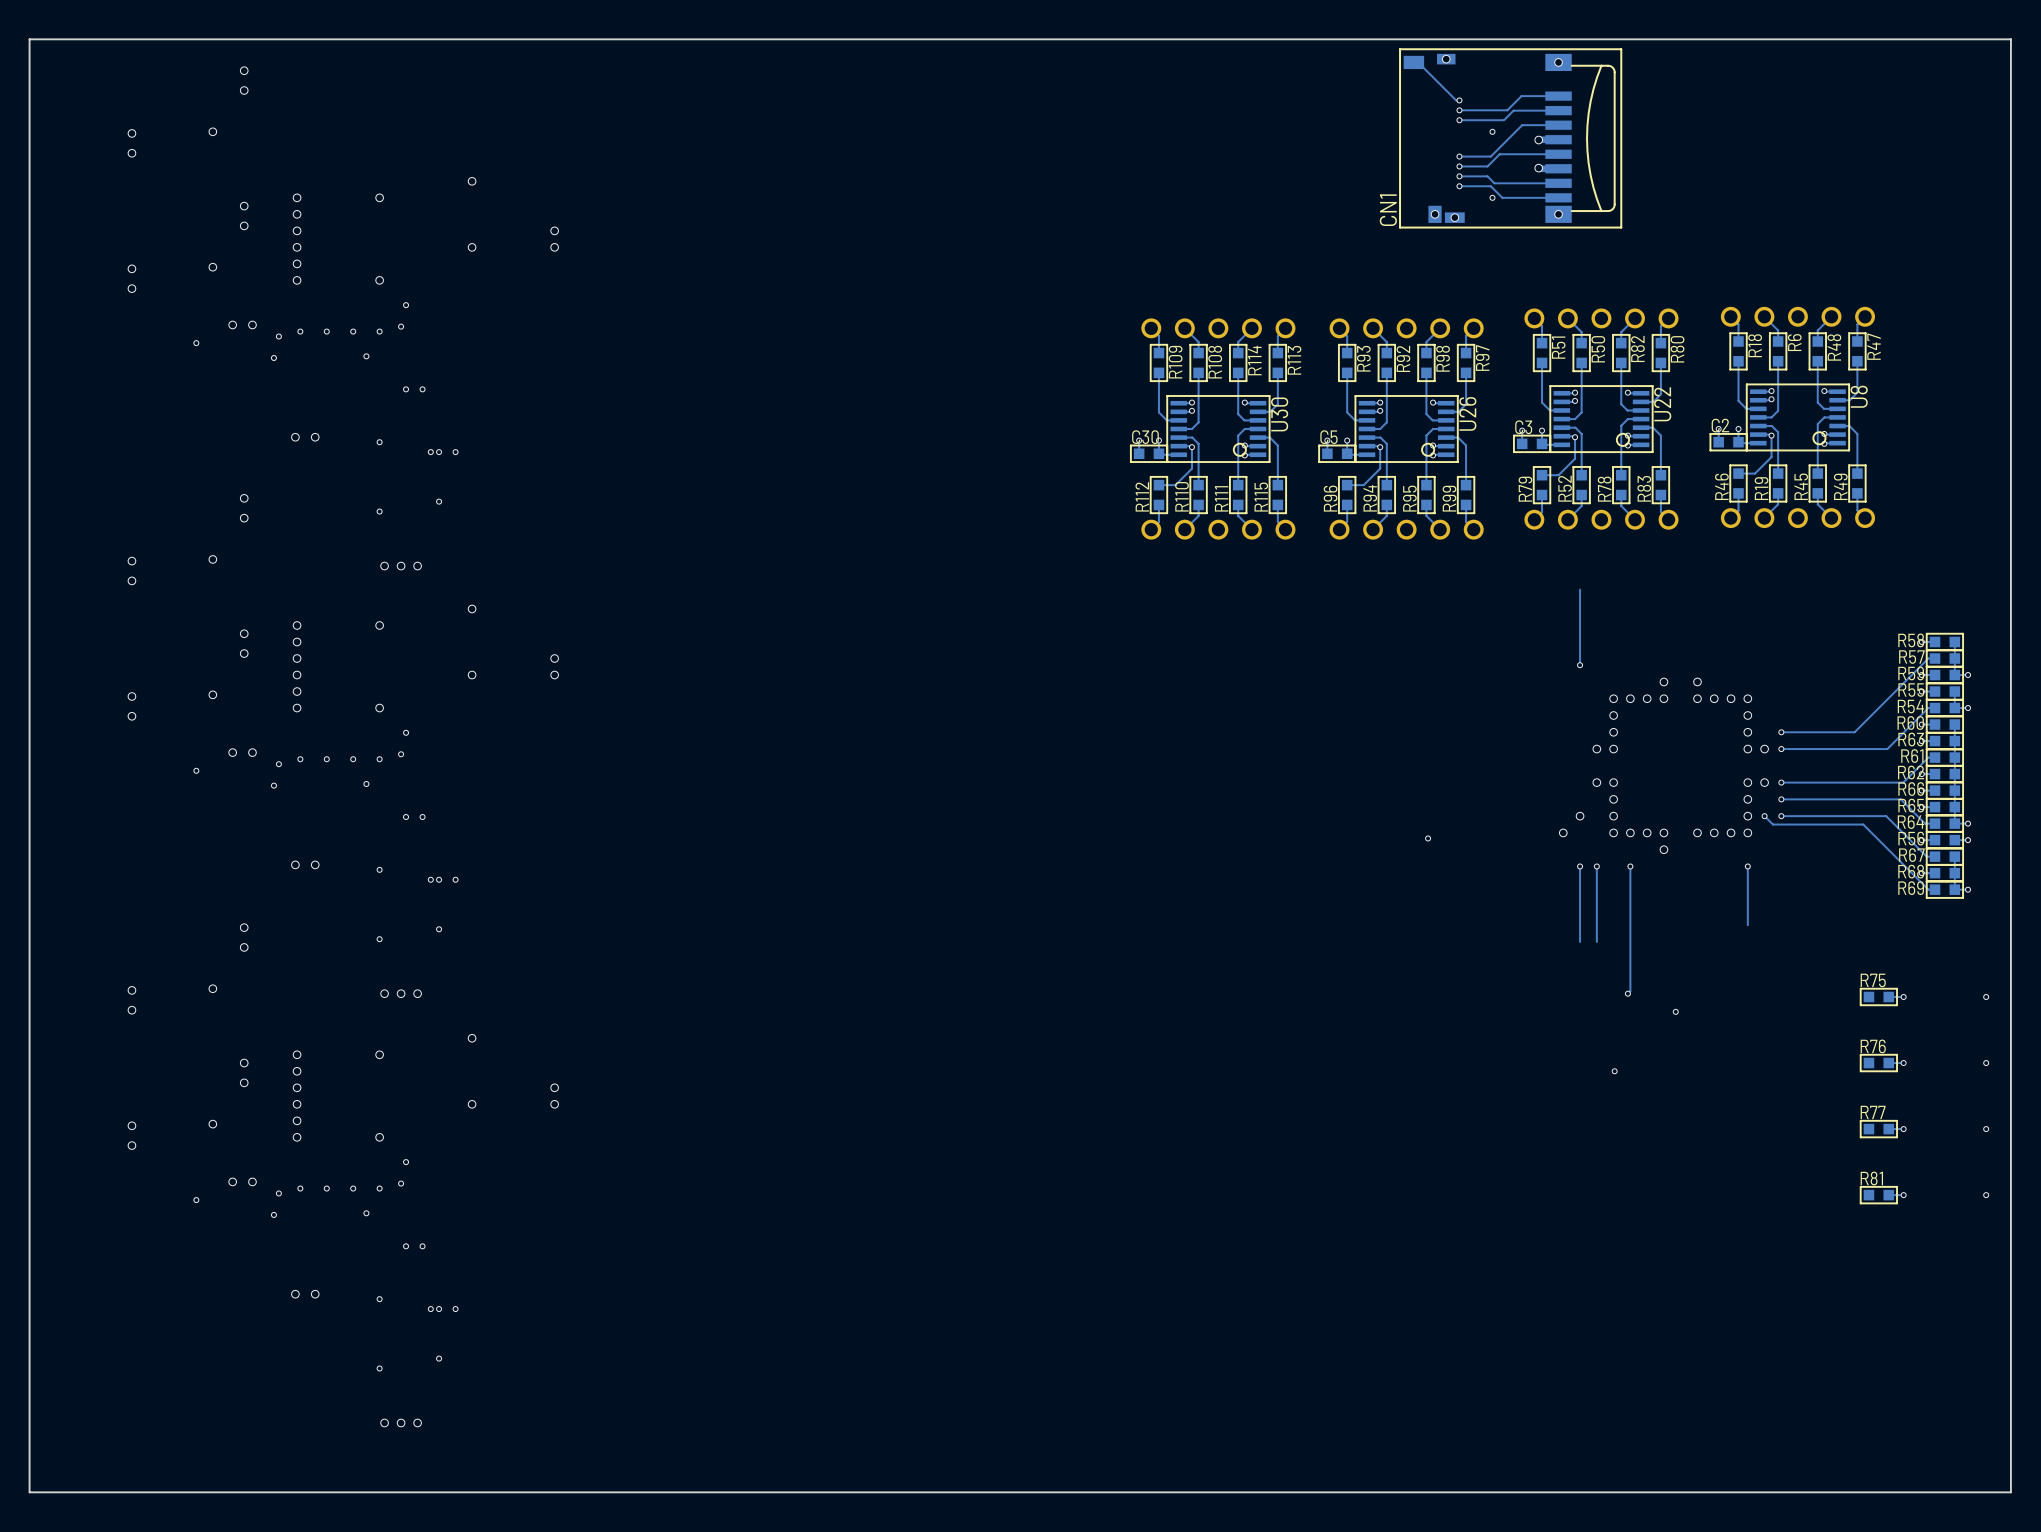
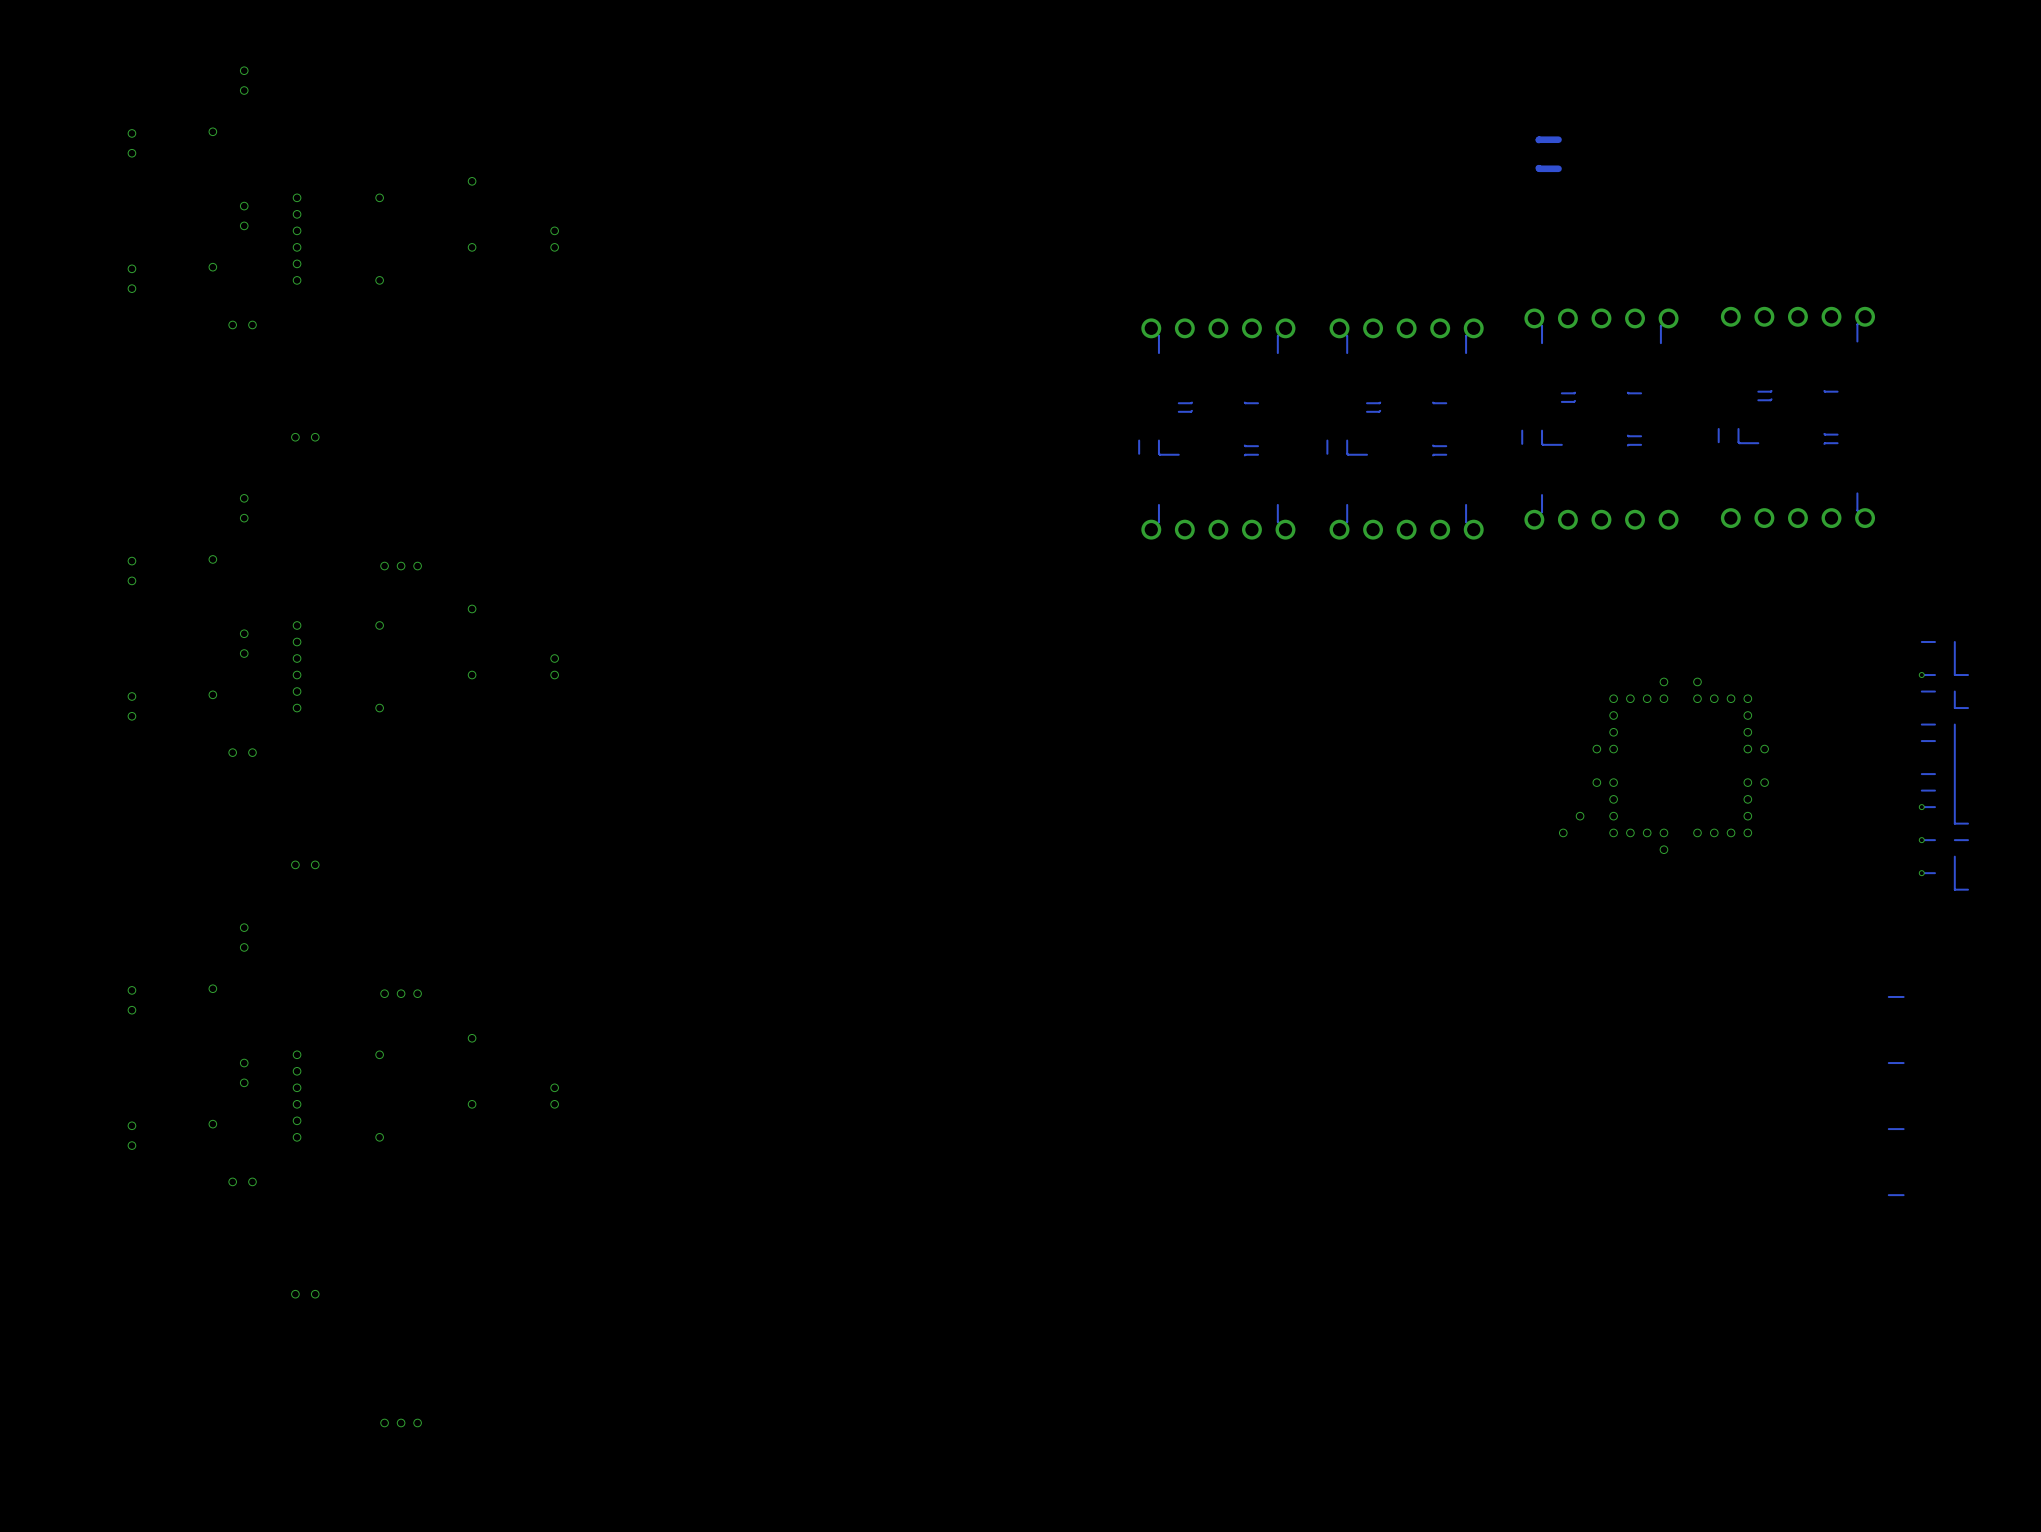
board edge: (2010, 39) (29, 39) (29, 1492) (2010, 1492) (2010, 39) -> none
via: (1446, 59) -> none
track: (1413, 62) (1418, 62) (1456, 100) (1459, 100) -> none
via: (1558, 62) -> none
track: (1558, 96) (1521, 96) (1507, 110) (1459, 110) -> none
via: (1459, 100) -> none
via: (1459, 110) -> none
track: (1558, 110) (1513, 110) (1504, 120) (1459, 120) -> none
via: (1459, 120) -> none
track: (1558, 125) (1522, 125) (1490, 156) (1459, 156) -> none
via: (1492, 131) -> none
CN1: (1510, 138) -> none
via: (1538, 140) -> none
track: (1558, 154) (1499, 154) (1487, 166) (1459, 166) -> none
via: (1459, 156) -> none
via: (1459, 166) -> none
via: (1538, 168) -> none
track: (1459, 176) (1487, 176) (1494, 183) (1558, 183) -> none
via: (1459, 176) -> none
track: (1459, 186) (1490, 186) (1502, 197) (1558, 197) -> none
via: (1459, 186) -> none
via: (1492, 197) -> none
via: (1435, 214) -> none
via: (1558, 214) -> none
via: (1454, 217) -> none
via: (406, 305) -> none
track: (1730, 316) (1738, 324) (1738, 341) -> none
track: (1764, 316) (1778, 330) (1778, 341) -> none
track: (1831, 316) (1817, 330) (1817, 341) -> none
track: (1567, 318) (1581, 332) (1581, 343) -> none
track: (1635, 318) (1621, 332) (1621, 343) -> none
via: (401, 326) -> none
track: (1184, 328) (1198, 342) (1198, 353) -> none
track: (1251, 328) (1238, 342) (1238, 353) -> none
track: (1373, 328) (1386, 342) (1386, 353) -> none
track: (1440, 328) (1426, 342) (1426, 353) -> none
via: (300, 331) -> none
via: (326, 331) -> none
via: (353, 331) -> none
via: (379, 331) -> none
via: (278, 336) -> none
via: (196, 343) -> none
R18: (1738, 351) -> none
R6: (1778, 351) -> none
R48: (1817, 351) -> none
R47: (1857, 351) -> none
R51: (1542, 353) -> none
R50: (1581, 353) -> none
R82: (1621, 353) -> none
R80: (1660, 353) -> none
via: (366, 356) -> none
via: (273, 357) -> none
track: (1738, 361) (1738, 400) (1746, 408) (1758, 408) -> none
track: (1778, 361) (1778, 410) (1771, 417) (1758, 417) -> none
track: (1817, 361) (1817, 402) (1824, 408) (1837, 408) -> none
track: (1857, 361) (1857, 392) (1849, 400) (1837, 400) -> none
R109: (1158, 362) -> none
R108: (1198, 362) -> none
R114: (1238, 362) -> none
R113: (1277, 362) -> none
R93: (1347, 362) -> none
R92: (1386, 362) -> none
R98: (1426, 362) -> none
R97: (1466, 362) -> none
track: (1542, 362) (1542, 402) (1549, 410) (1561, 410) -> none
track: (1581, 362) (1581, 412) (1575, 419) (1561, 419) -> none
track: (1621, 362) (1621, 404) (1627, 410) (1641, 410) -> none
track: (1660, 362) (1660, 394) (1653, 401) (1641, 401) -> none
track: (1158, 372) (1158, 412) (1166, 420) (1178, 420) -> none
track: (1198, 372) (1198, 422) (1191, 428) (1178, 428) -> none
track: (1238, 372) (1238, 414) (1244, 420) (1258, 420) -> none
track: (1277, 372) (1277, 404) (1270, 411) (1258, 411) -> none
track: (1347, 372) (1347, 412) (1355, 420) (1367, 420) -> none
track: (1386, 372) (1386, 422) (1380, 428) (1367, 428) -> none
track: (1426, 372) (1426, 414) (1432, 420) (1446, 420) -> none
track: (1466, 372) (1466, 404) (1458, 411) (1446, 411) -> none
via: (406, 389) -> none
via: (422, 389) -> none
via: (1771, 391) -> none
via: (1824, 391) -> none
via: (1575, 392) -> none
via: (1627, 392) -> none
via: (1771, 399) -> none
via: (1575, 400) -> none
via: (1191, 402) -> none
via: (1244, 402) -> none
via: (1380, 402) -> none
via: (1433, 402) -> none
via: (1191, 410) -> none
via: (1380, 410) -> none
U8: (1797, 417) -> none
track: (1837, 417) (1824, 417) (1817, 424) (1817, 473) -> none
U22: (1601, 419) -> none
track: (1641, 419) (1627, 419) (1621, 425) (1621, 475) -> none
track: (1758, 426) (1771, 426) (1778, 432) (1778, 473) -> none
track: (1837, 426) (1849, 426) (1857, 433) (1857, 473) -> none
track: (1561, 427) (1575, 427) (1581, 433) (1581, 475) -> none
track: (1641, 427) (1652, 427) (1660, 435) (1660, 475) -> none
U30: (1218, 428) -> none
track: (1258, 428) (1244, 428) (1238, 435) (1238, 485) -> none
U26: (1406, 428) -> none
track: (1446, 428) (1433, 428) (1426, 435) (1426, 485) -> none
via: (1718, 428) -> none
via: (1738, 428) -> none
via: (1522, 430) -> none
via: (1542, 430) -> none
via: (1824, 433) -> none
track: (1758, 434) (1771, 435) (1771, 457) (1755, 473) (1738, 473) -> none
via: (1627, 435) -> none
via: (1771, 435) -> none
track: (1561, 436) (1575, 437) (1575, 458) (1558, 475) (1542, 475) -> none
track: (1178, 437) (1192, 437) (1198, 443) (1198, 485) -> none
track: (1258, 437) (1269, 437) (1277, 445) (1277, 485) -> none
track: (1367, 437) (1380, 437) (1386, 443) (1386, 485) -> none
track: (1446, 437) (1458, 437) (1466, 445) (1466, 485) -> none
via: (1575, 437) -> none
via: (1139, 440) -> none
via: (1158, 440) -> none
via: (1327, 440) -> none
via: (1347, 440) -> none
via: (379, 442) -> none
C2: (1728, 442) -> none
C3: (1532, 443) -> none
via: (1824, 443) -> none
via: (1244, 445) -> none
via: (1433, 445) -> none
via: (1627, 445) -> none
track: (1178, 446) (1191, 447) (1191, 468) (1175, 485) (1158, 485) -> none
track: (1367, 446) (1380, 447) (1380, 468) (1363, 485) (1347, 485) -> none
via: (1191, 447) -> none
via: (1380, 447) -> none
via: (430, 452) -> none
via: (439, 452) -> none
via: (455, 452) -> none
C30: (1149, 453) -> none
C5: (1337, 453) -> none
via: (1244, 455) -> none
via: (1433, 455) -> none
R46: (1738, 483) -> none
R19: (1778, 483) -> none
R45: (1817, 483) -> none
R49: (1857, 483) -> none
R79: (1542, 485) -> none
R52: (1581, 485) -> none
R78: (1621, 485) -> none
R83: (1660, 485) -> none
track: (1738, 493) (1738, 510) (1730, 518) -> none
track: (1778, 493) (1778, 504) (1764, 518) -> none
track: (1817, 493) (1817, 504) (1831, 518) -> none
R112: (1158, 495) -> none
R110: (1198, 495) -> none
R111: (1238, 495) -> none
R115: (1277, 495) -> none
R96: (1347, 495) -> none
R94: (1386, 495) -> none
R95: (1426, 495) -> none
R99: (1466, 495) -> none
track: (1581, 495) (1581, 506) (1567, 519) -> none
track: (1621, 495) (1621, 506) (1635, 519) -> none
track: (1660, 495) (1660, 512) (1668, 519) -> none
via: (439, 501) -> none
track: (1198, 504) (1198, 515) (1184, 529) -> none
track: (1238, 504) (1238, 515) (1251, 529) -> none
track: (1386, 504) (1386, 515) (1373, 529) -> none
track: (1426, 504) (1426, 515) (1440, 529) -> none
via: (379, 511) -> none
track: (1580, 589) (1580, 665) -> none
via: (1921, 641) -> none
R58: (1944, 641) -> none
track: (1934, 658) (1928, 658) (1854, 732) (1781, 732) -> none
R57: (1944, 658) -> none
via: (1580, 665) -> none
R59: (1944, 675) -> none
via: (1968, 675) -> none
via: (1921, 691) -> none
R55: (1944, 691) -> none
track: (1934, 708) (1928, 708) (1887, 749) (1781, 749) -> none
R54: (1944, 708) -> none
via: (1968, 708) -> none
via: (1921, 724) -> none
R60: (1944, 724) -> none
via: (406, 732) -> none
via: (1781, 732) -> none
via: (1921, 741) -> none
R63: (1944, 741) -> none
via: (1781, 749) -> none
via: (401, 754) -> none
track: (1934, 757) (1928, 757) (1903, 782) (1781, 782) -> none
R61: (1944, 757) -> none
via: (300, 759) -> none
via: (326, 759) -> none
via: (353, 759) -> none
via: (379, 759) -> none
via: (278, 764) -> none
via: (196, 770) -> none
via: (1921, 774) -> none
R62: (1944, 774) -> none
via: (1781, 782) -> none
via: (366, 783) -> none
via: (273, 785) -> none
via: (1921, 790) -> none
R66: (1944, 790) -> none
track: (1781, 799) (1900, 799) (1925, 823) (1934, 823) -> none
via: (1781, 799) -> none
R65: (1944, 807) -> none
track: (1764, 816) (1772, 824) (1863, 824) (1928, 889) (1934, 889) -> none
via: (1764, 816) -> none
track: (1781, 816) (1886, 816) (1926, 856) (1934, 856) -> none
via: (1781, 816) -> none
via: (406, 817) -> none
via: (422, 817) -> none
R64: (1944, 823) -> none
via: (1968, 823) -> none
via: (1428, 838) -> none
R56: (1944, 840) -> none
via: (1968, 840) -> none
R67: (1944, 856) -> none
track: (1580, 866) (1580, 941) -> none
via: (1580, 866) -> none
track: (1596, 866) (1596, 941) -> none
via: (1596, 866) -> none
track: (1630, 866) (1630, 991) (1627, 993) -> none
via: (1630, 866) -> none
track: (1747, 866) (1747, 925) -> none
via: (1747, 866) -> none
via: (379, 869) -> none
R68: (1944, 873) -> none
via: (430, 879) -> none
via: (439, 879) -> none
via: (455, 879) -> none
R69: (1944, 889) -> none
via: (1968, 889) -> none
via: (439, 929) -> none
via: (379, 939) -> none
via: (1627, 993) -> none
R75: (1878, 996) -> none
via: (1903, 996) -> none
via: (1986, 996) -> none
via: (1675, 1011) -> none
R76: (1878, 1063) -> none
via: (1903, 1063) -> none
via: (1986, 1063) -> none
via: (1614, 1071) -> none
R77: (1878, 1129) -> none
via: (1903, 1129) -> none
via: (1986, 1129) -> none
via: (406, 1162) -> none
via: (401, 1183) -> none
via: (300, 1188) -> none
via: (326, 1188) -> none
via: (353, 1188) -> none
via: (379, 1188) -> none
via: (278, 1193) -> none
R81: (1878, 1195) -> none
via: (1903, 1195) -> none
via: (1986, 1195) -> none
via: (196, 1200) -> none
via: (366, 1213) -> none
via: (273, 1214) -> none
via: (406, 1246) -> none
via: (422, 1246) -> none
via: (379, 1299) -> none
via: (430, 1309) -> none
via: (439, 1309) -> none
via: (455, 1309) -> none
via: (439, 1358) -> none
via: (379, 1368) -> none

